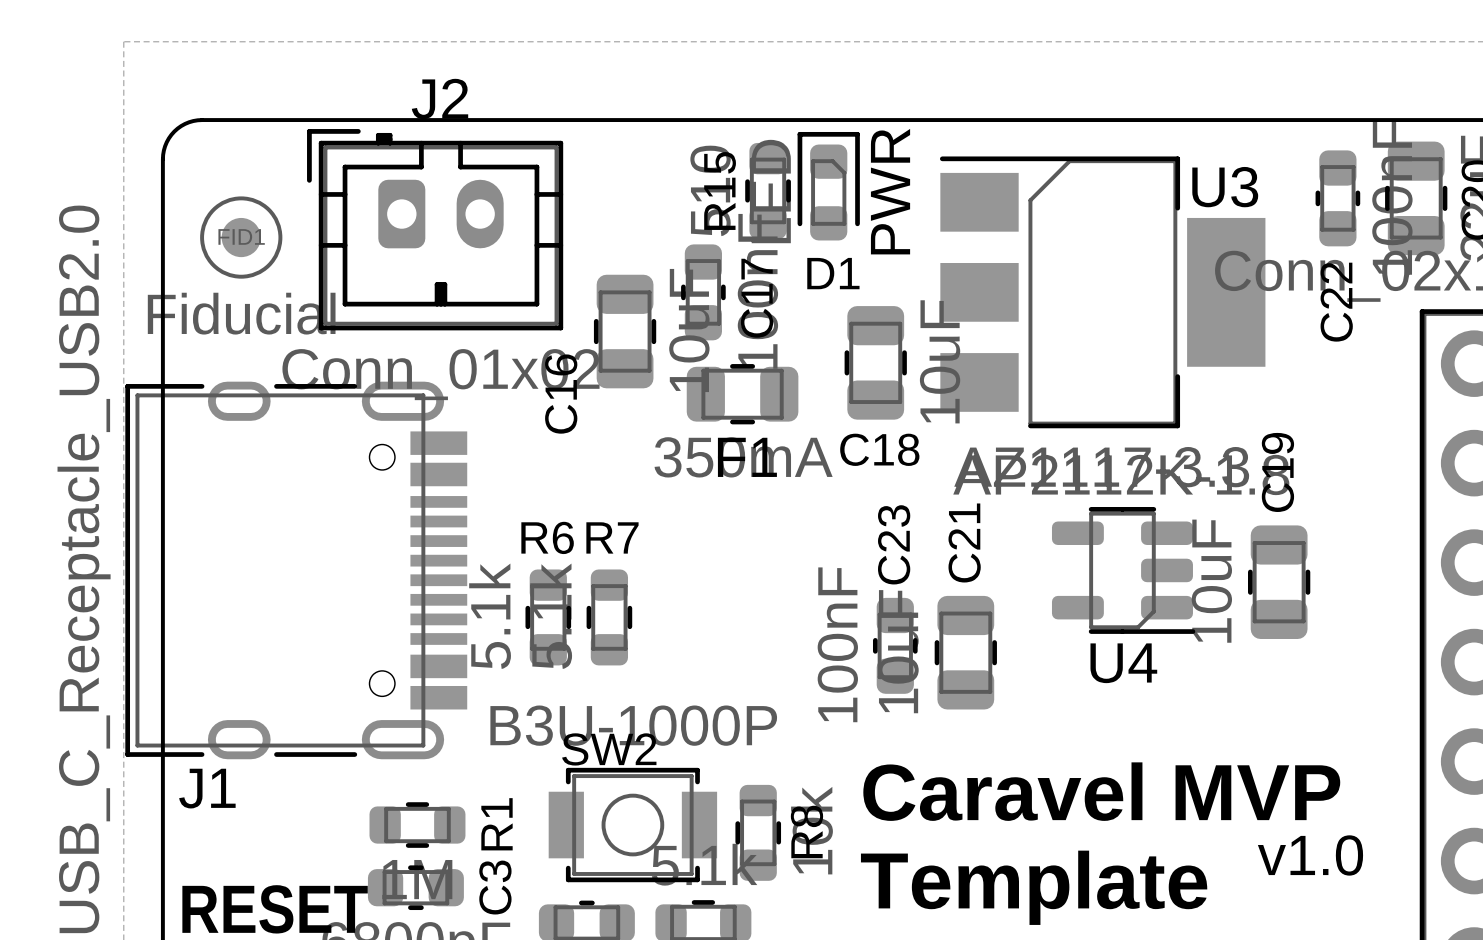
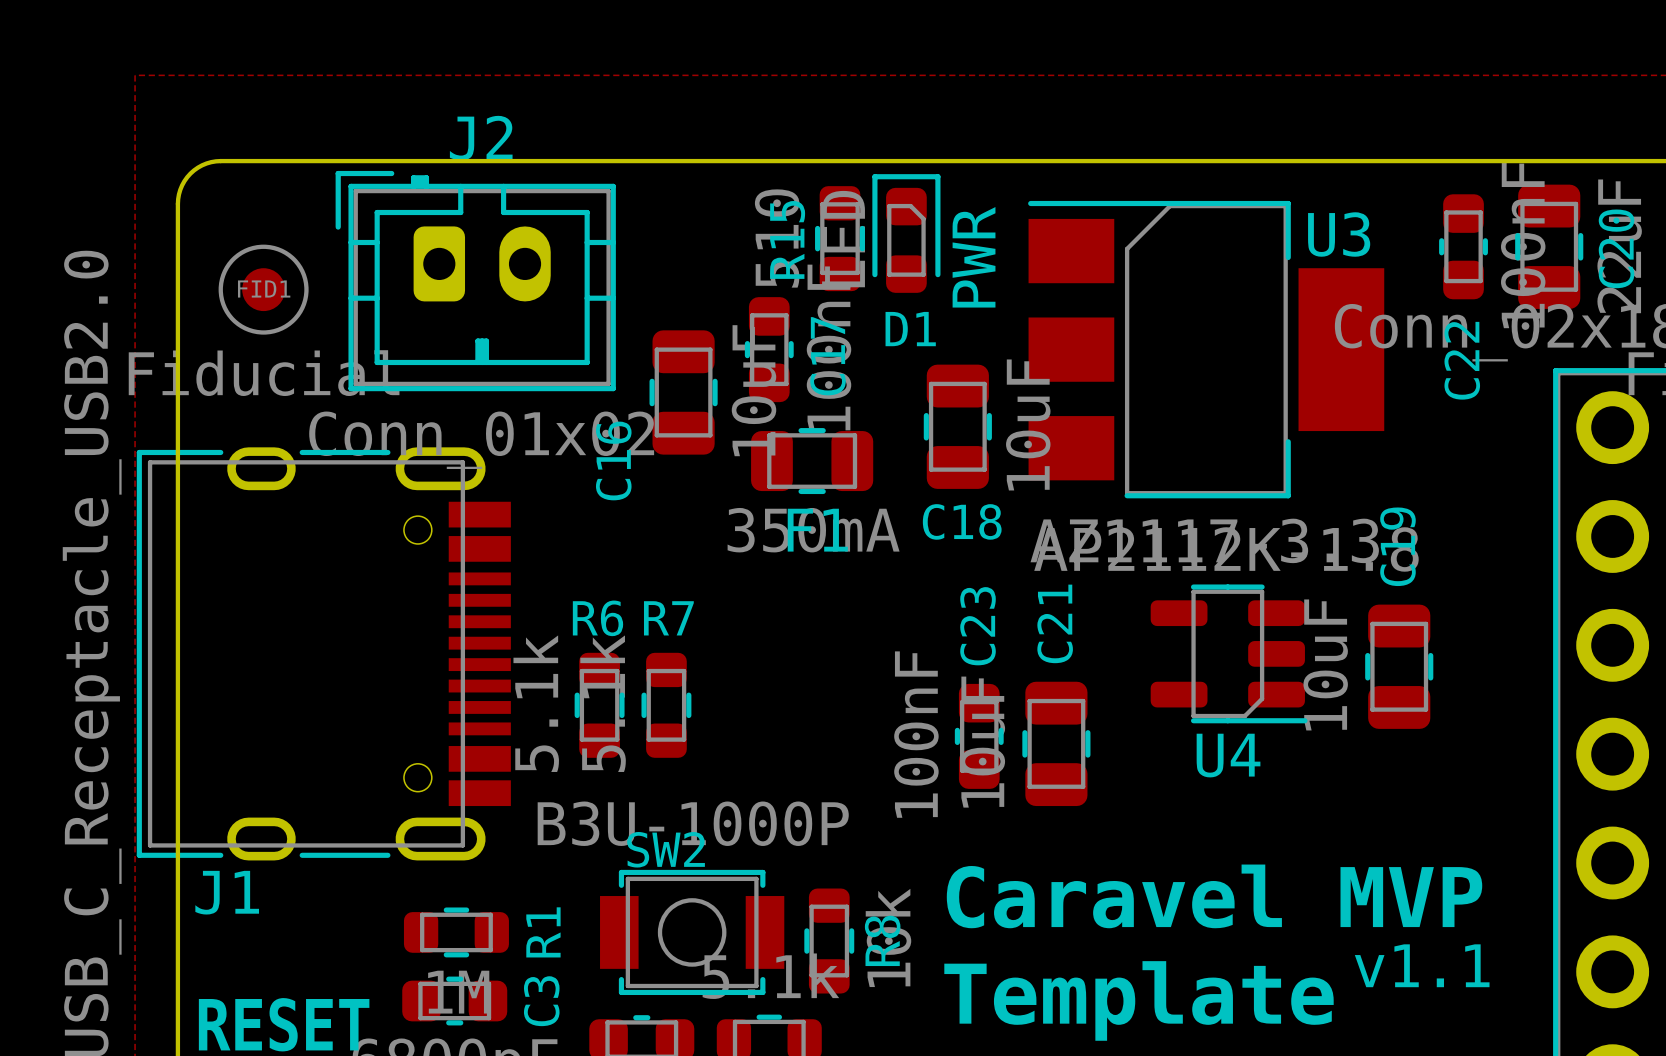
text: v1.0 (1310, 855) -> v1.1 (1422, 965)

